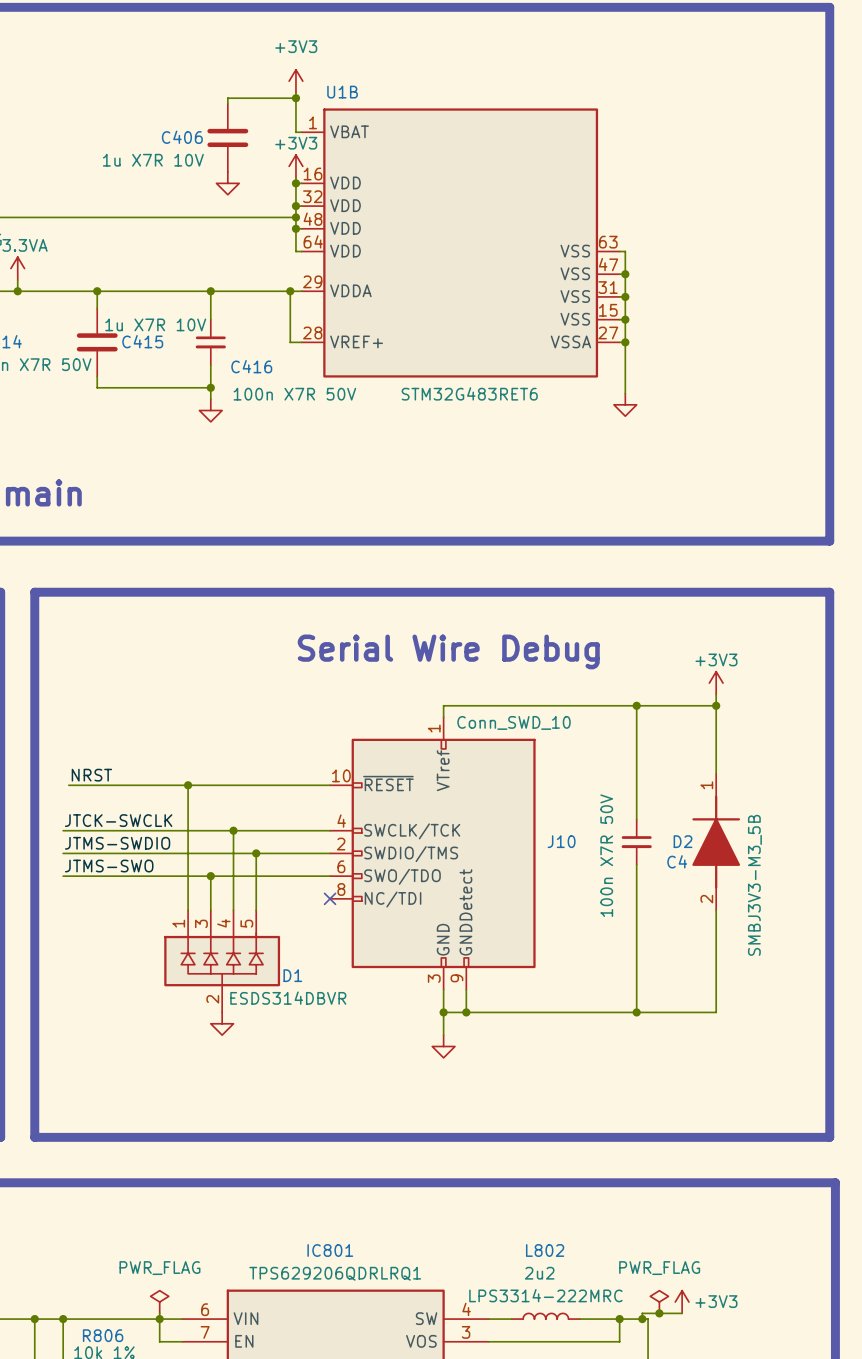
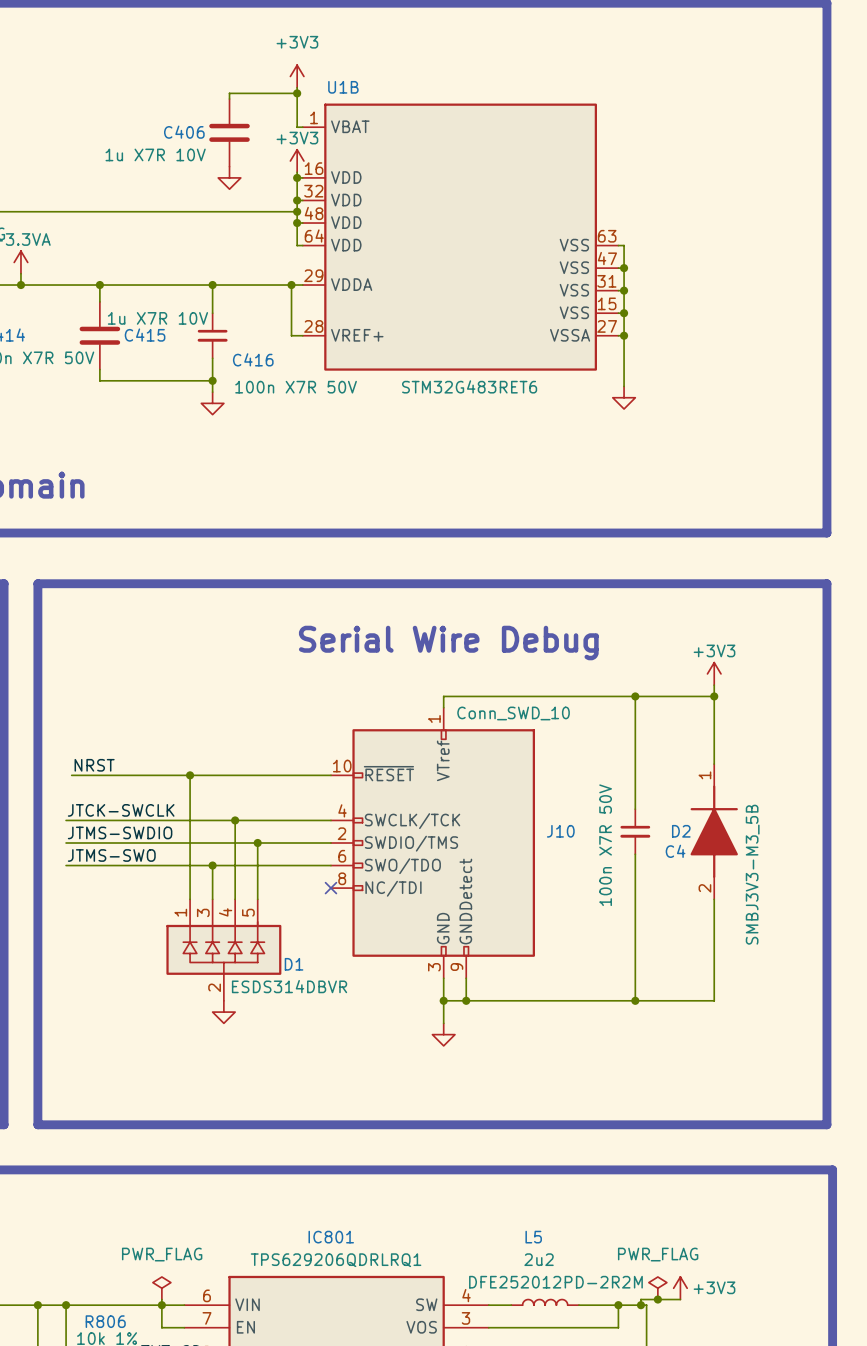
L802 name: L802 (545, 1250) -> L5 (533, 1237)
L802 text: LPS3314-222MRC (545, 1295) -> DFE252012PD-2R2M (555, 1282)

